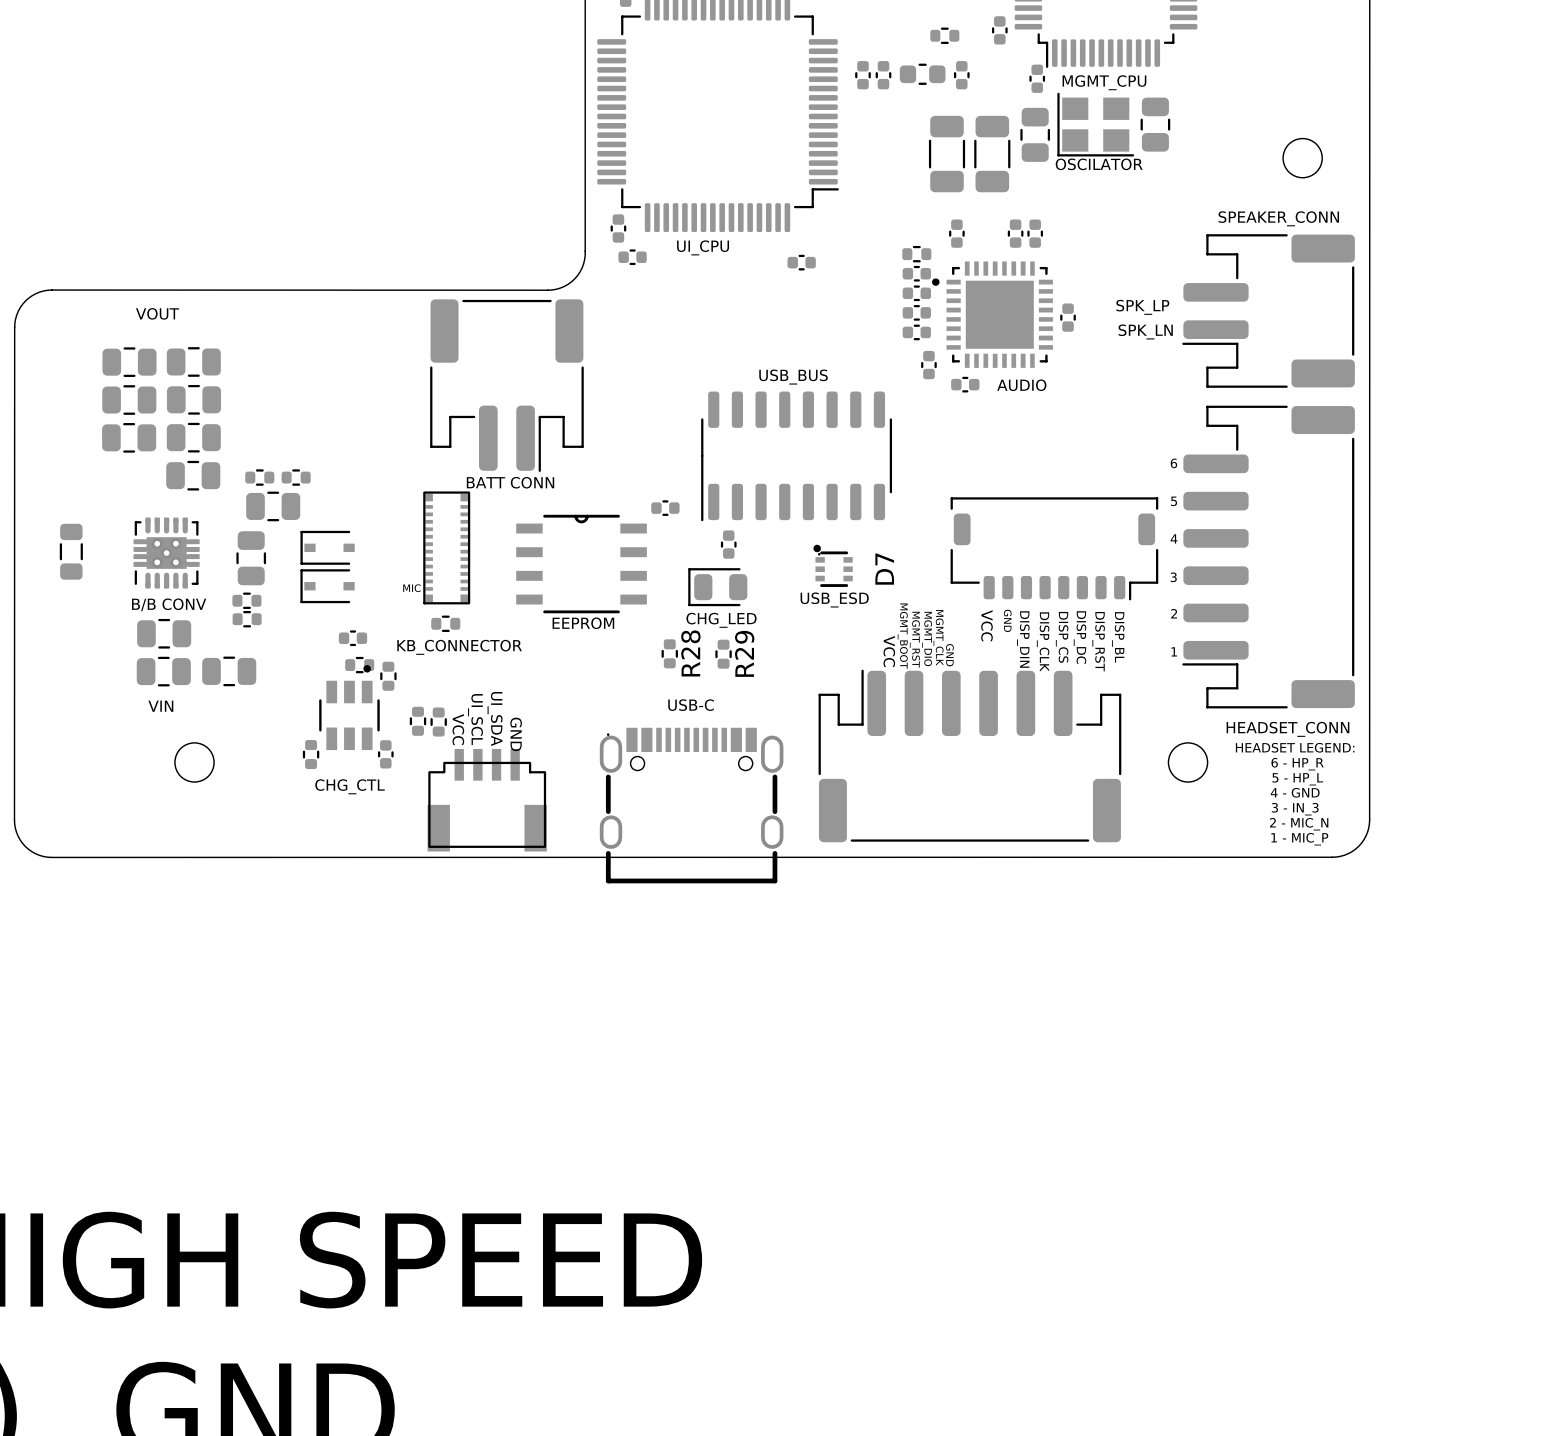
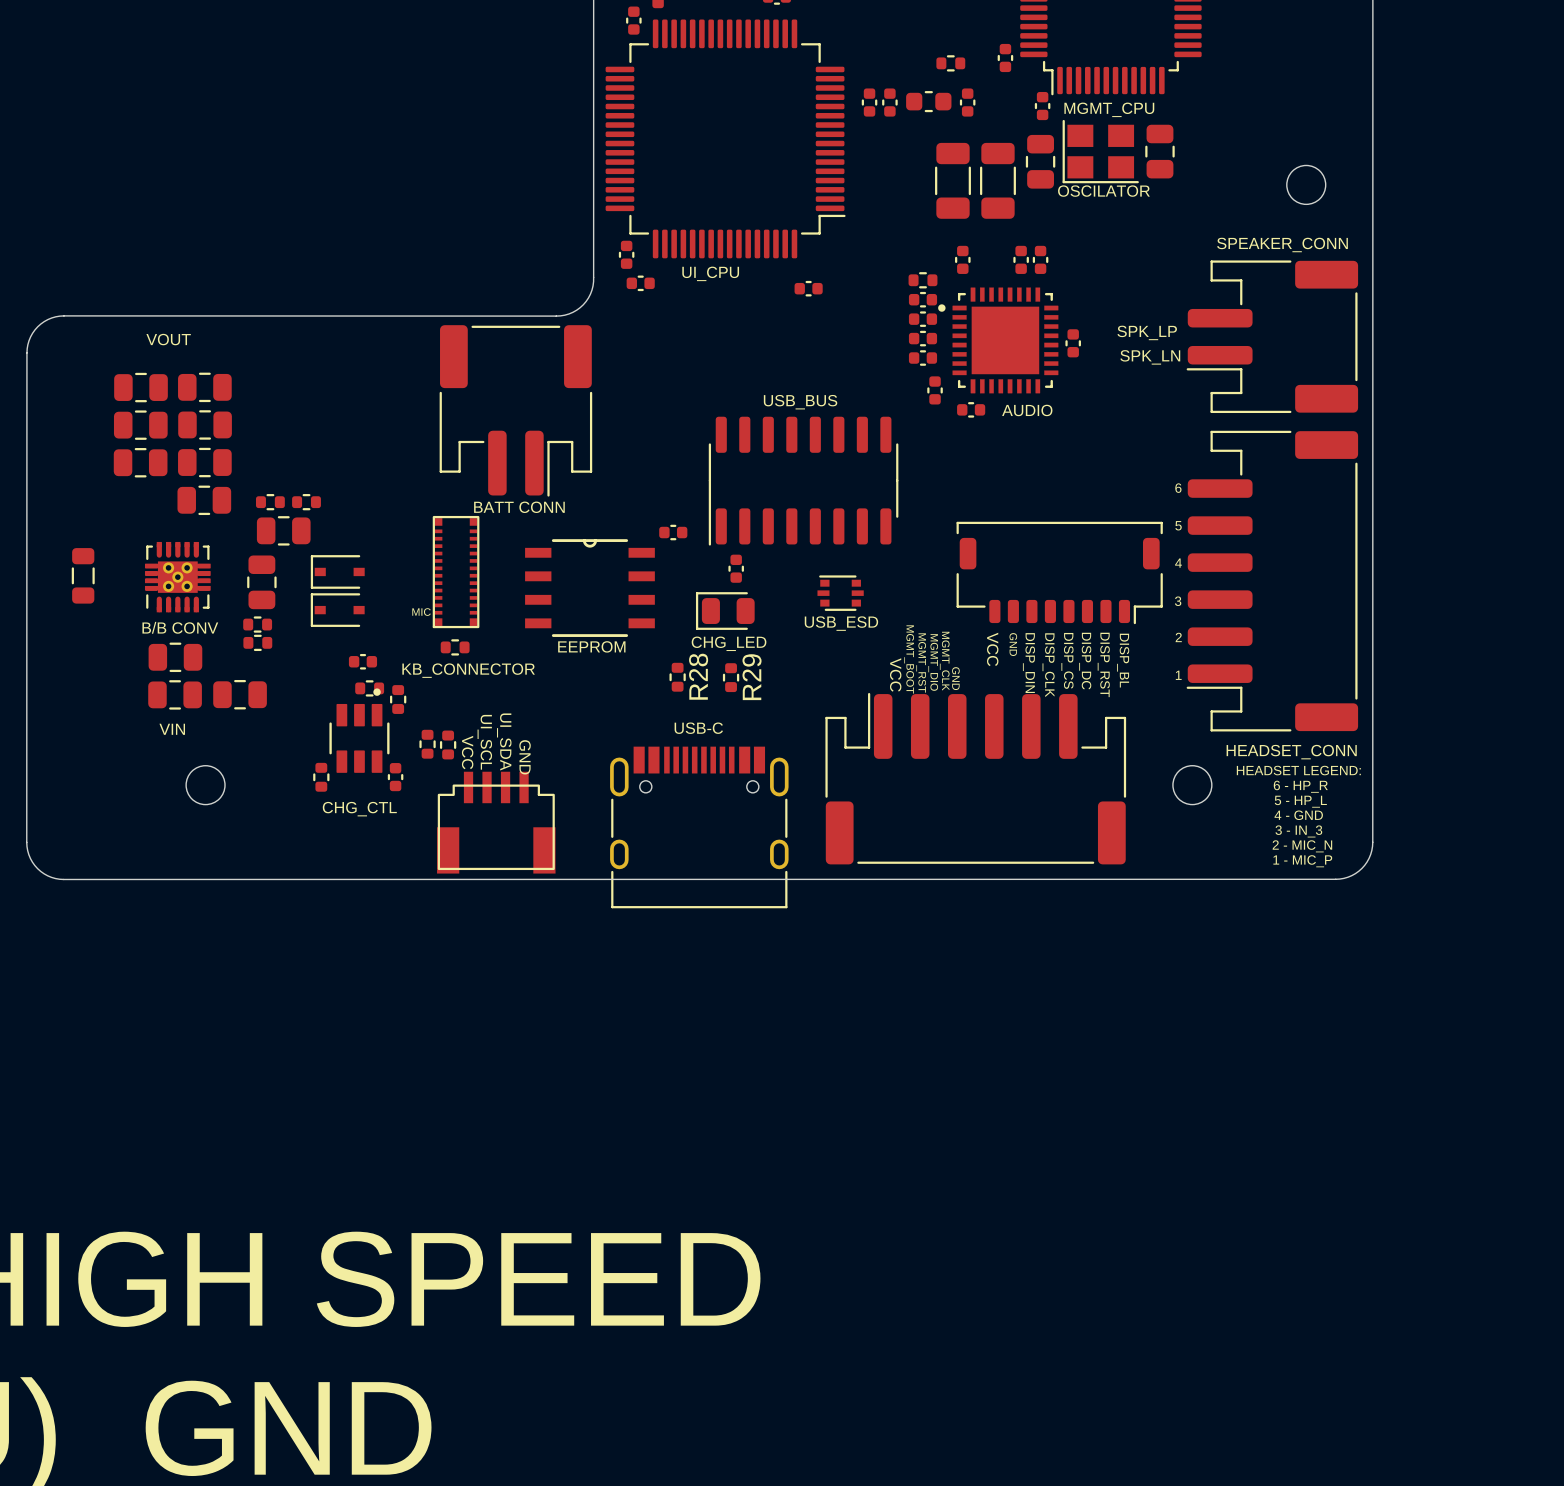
D7: (833, 565) -> none
part: none -> (840, 593)
part footprint: [599, 727, 784, 884] -> [610, 746, 789, 909]

